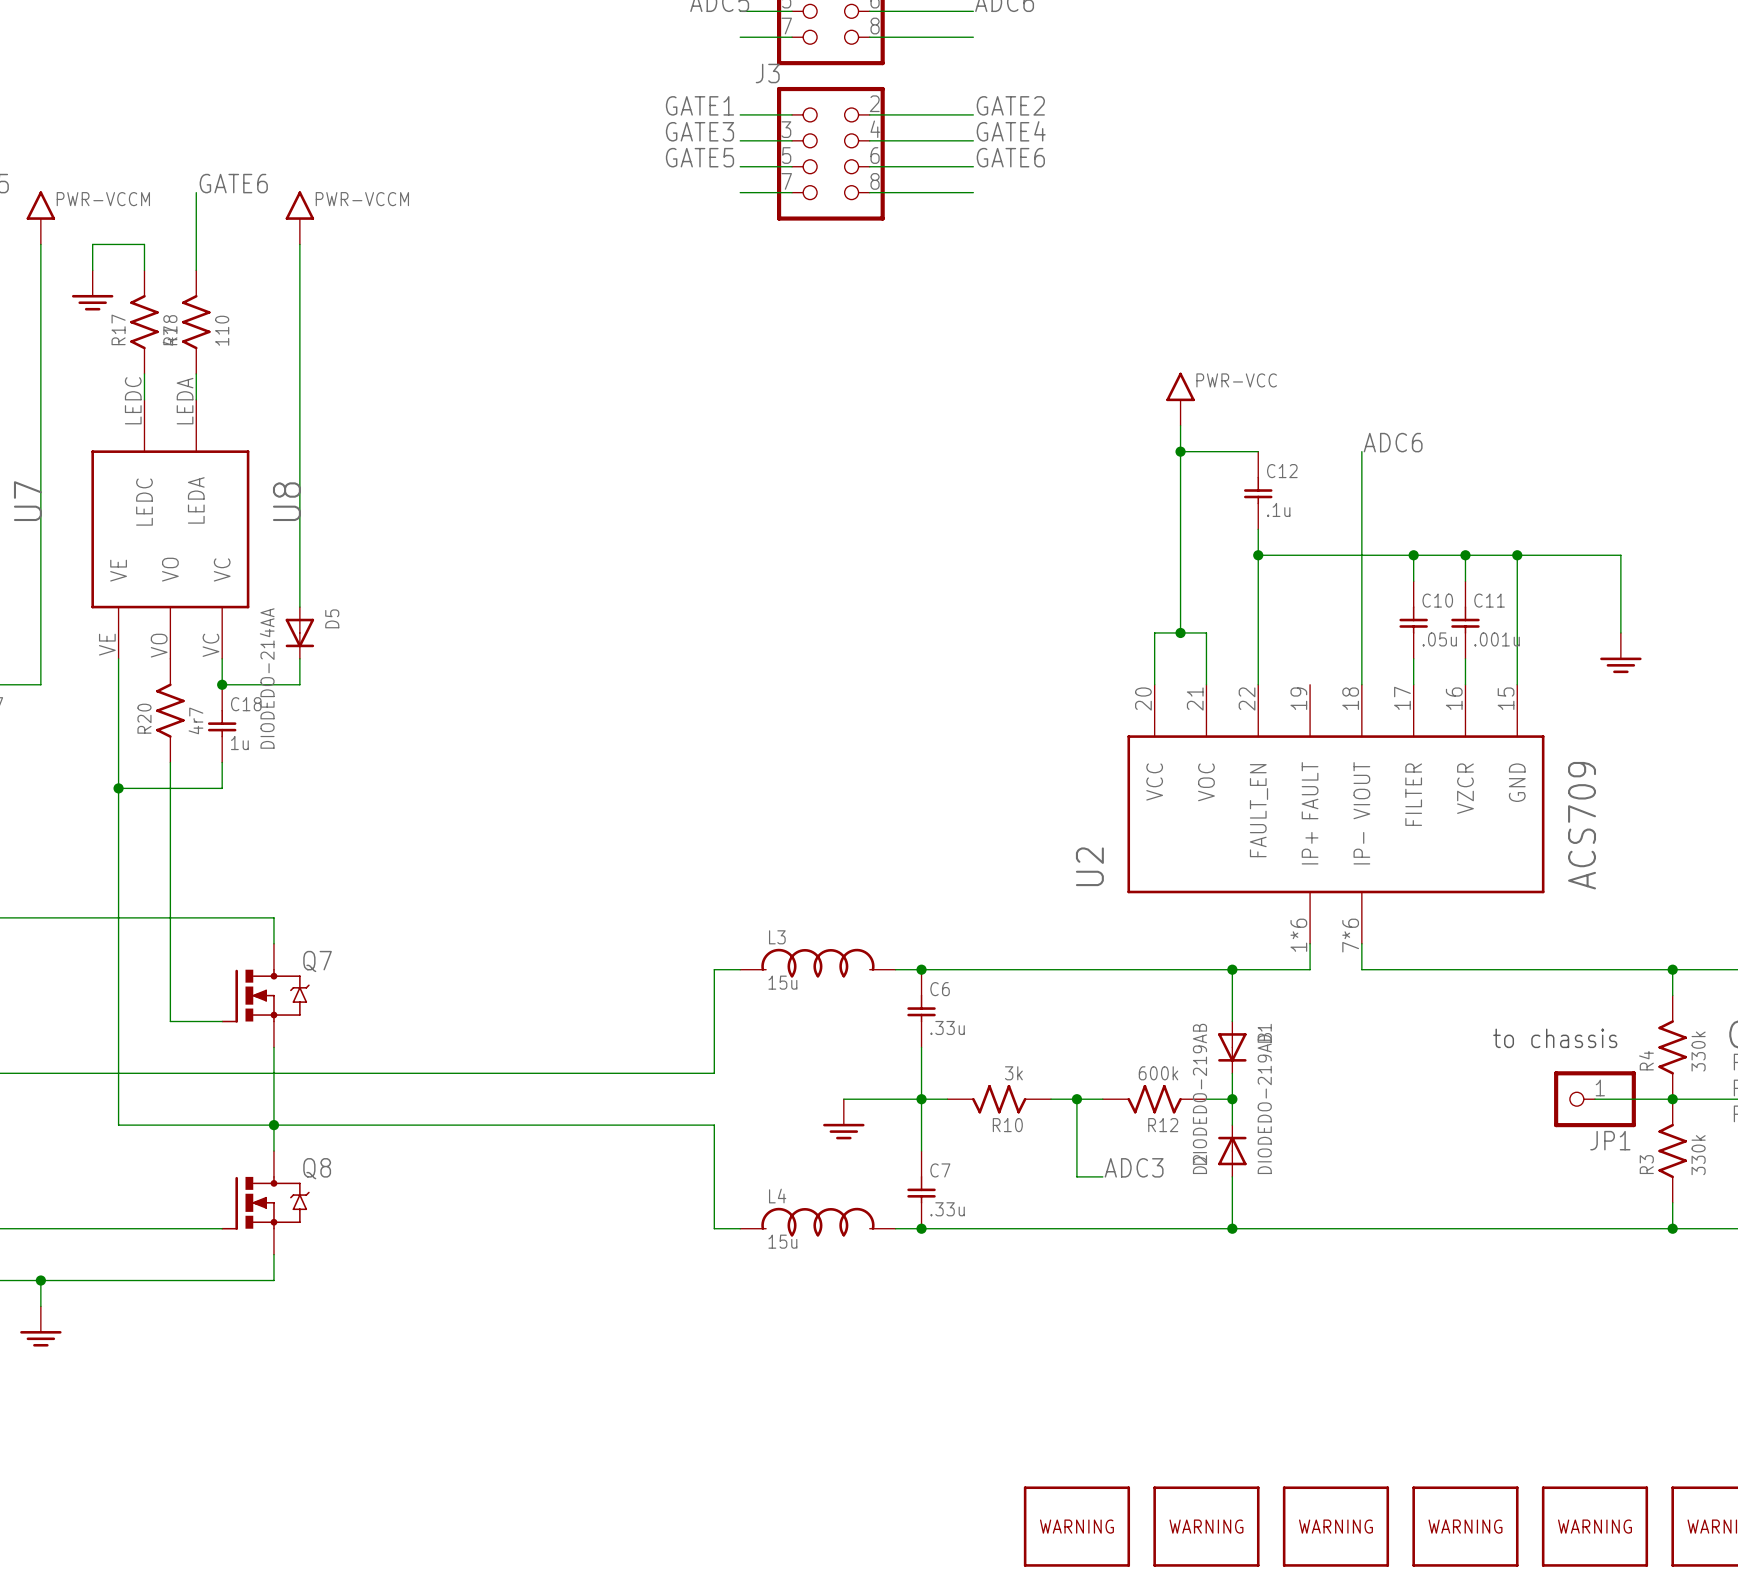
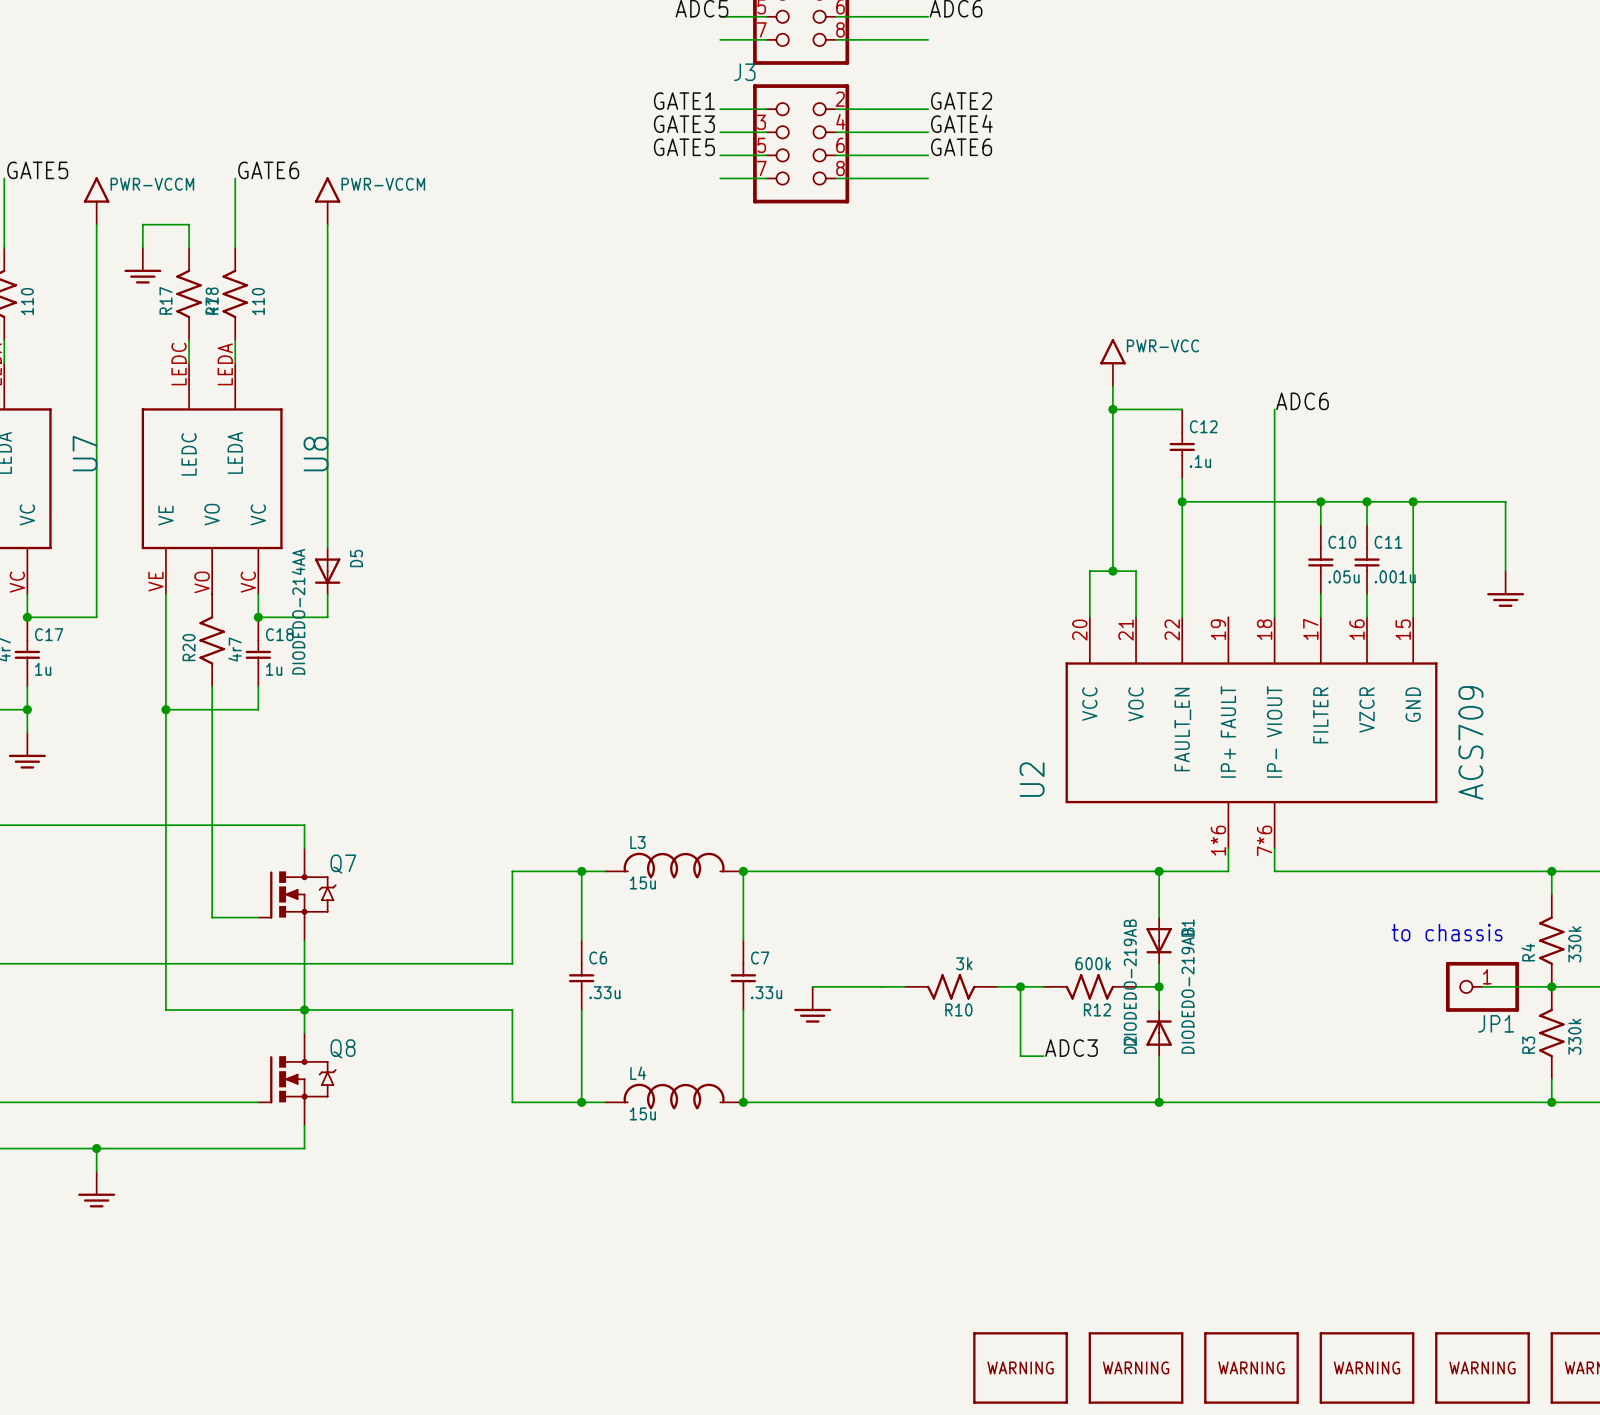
L3 position: (817, 963) -> (674, 865)
wire: none -> (581, 871) (581, 940)
junction: none -> (581, 871)
wire: (740, 969) (714, 969) (714, 1073) (507, 1073) -> (604, 871) (512, 871) (512, 963)
junction: none -> (743, 871)
wire: none -> (858, 871) (743, 871) (743, 940)
junction: (921, 969) -> none
C6 position: (921, 1008) -> (581, 975)
wire: (921, 1047) (921, 1151) -> none
junction: (921, 1099) -> none
wire: (507, 1125) (714, 1125) (714, 1228) (740, 1228) -> (512, 1009) (512, 1102) (604, 1102)
wire: none -> (581, 1009) (581, 1102)
wire: none -> (743, 1009) (743, 1102) (858, 1102)
C7 position: (921, 1189) -> (743, 975)
L4 position: (817, 1222) -> (674, 1096)
junction: none -> (581, 1102)
junction: none -> (743, 1102)
junction: (921, 1228) -> none

